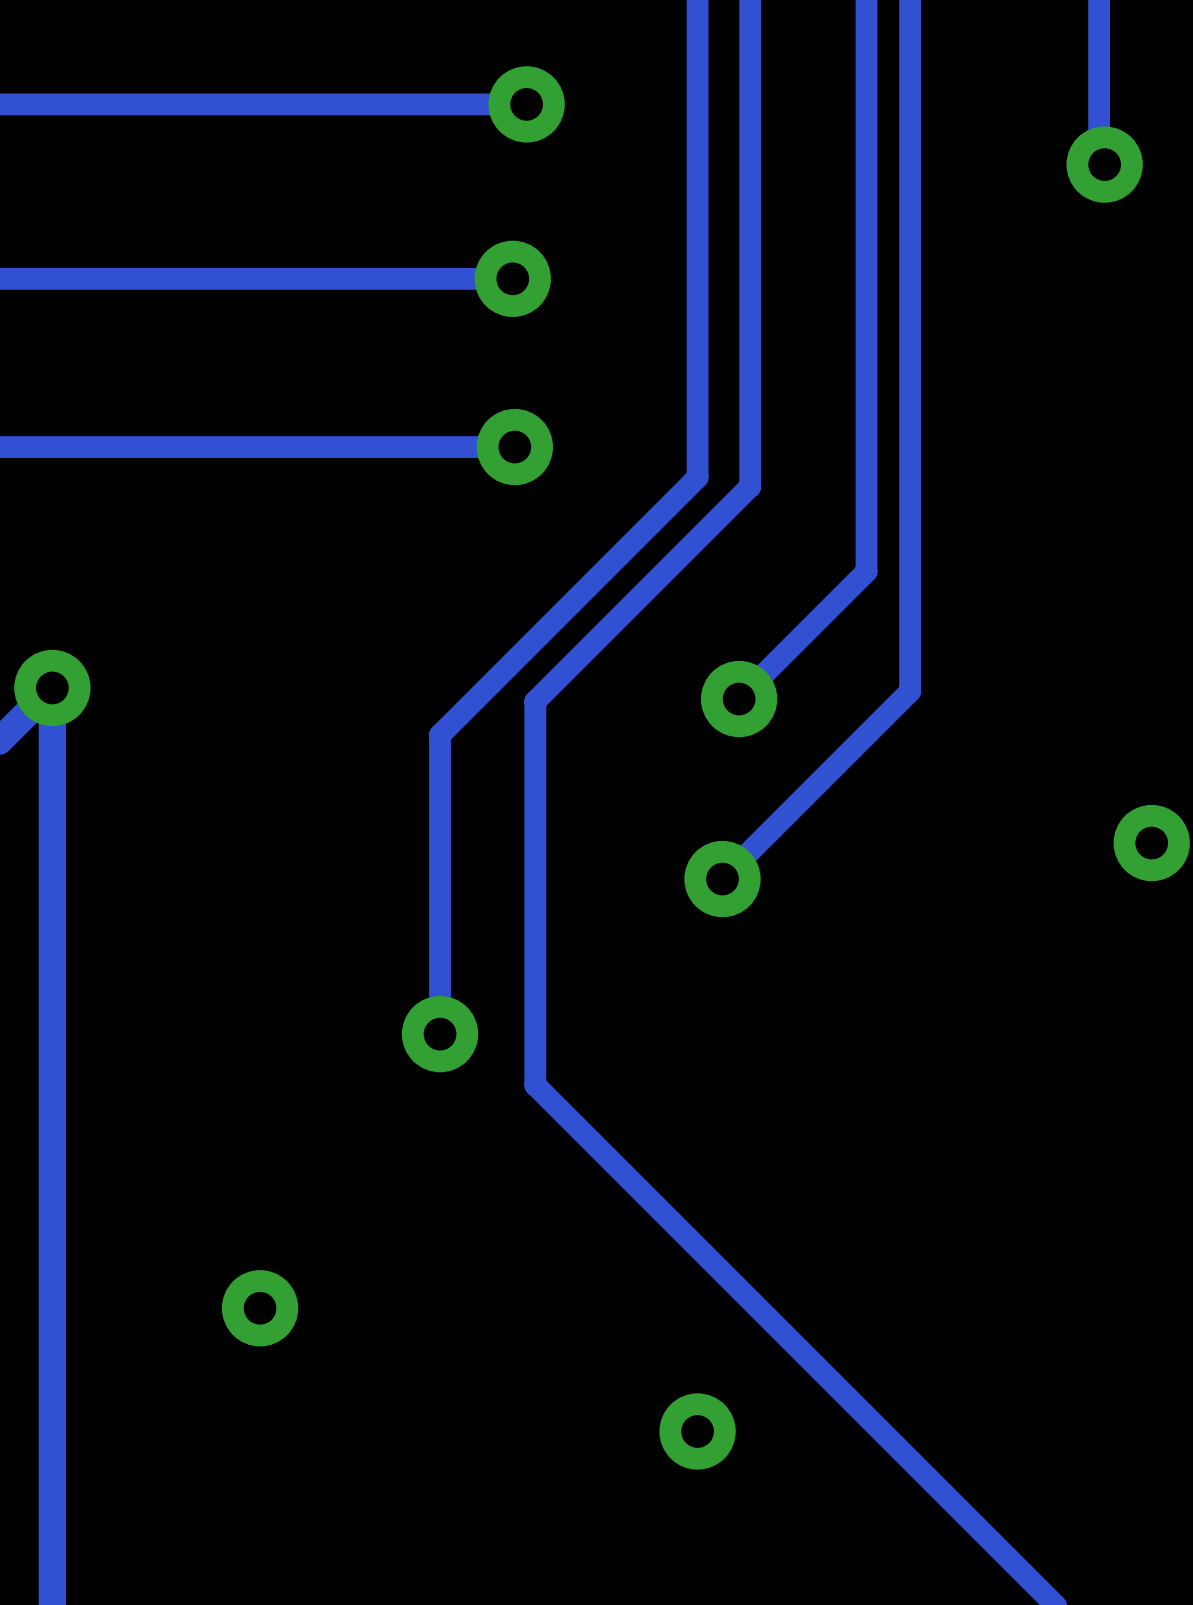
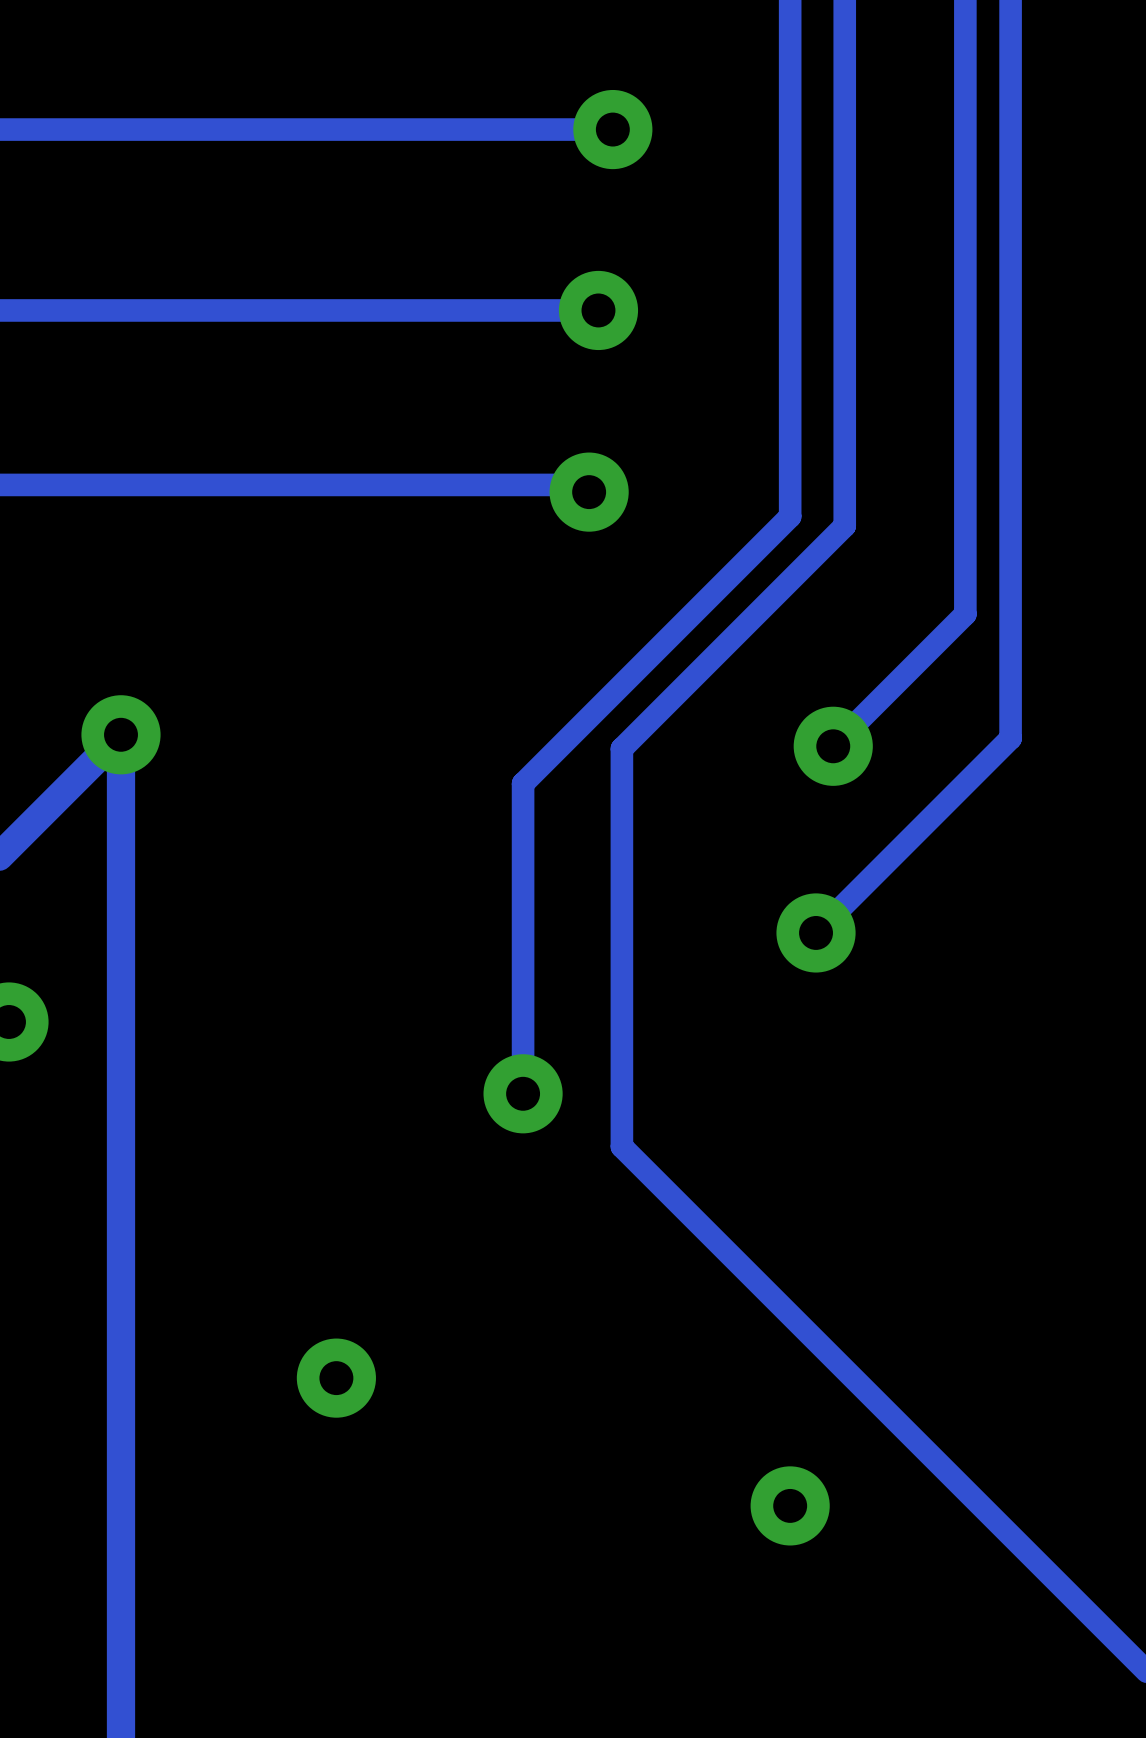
via position: (514, 447) -> (589, 492)

